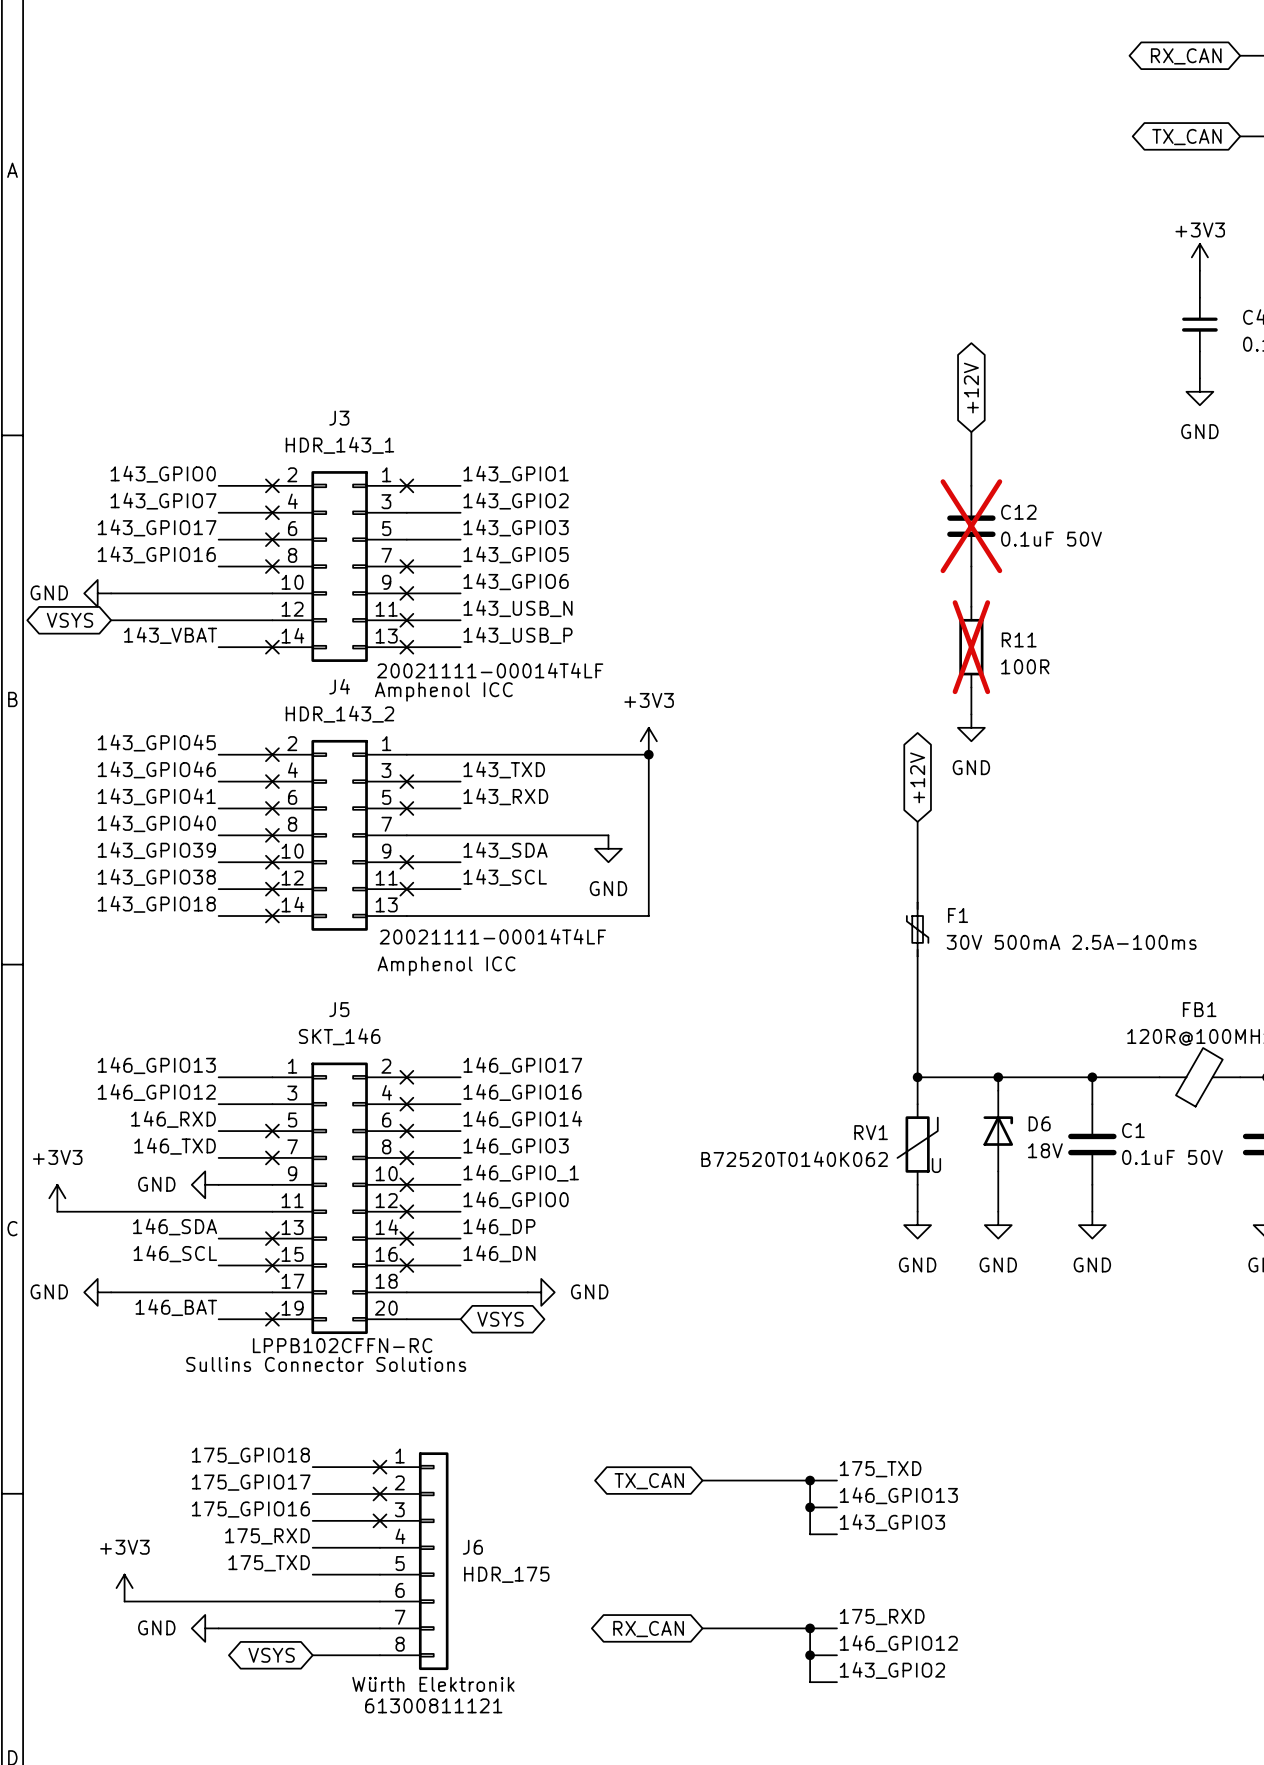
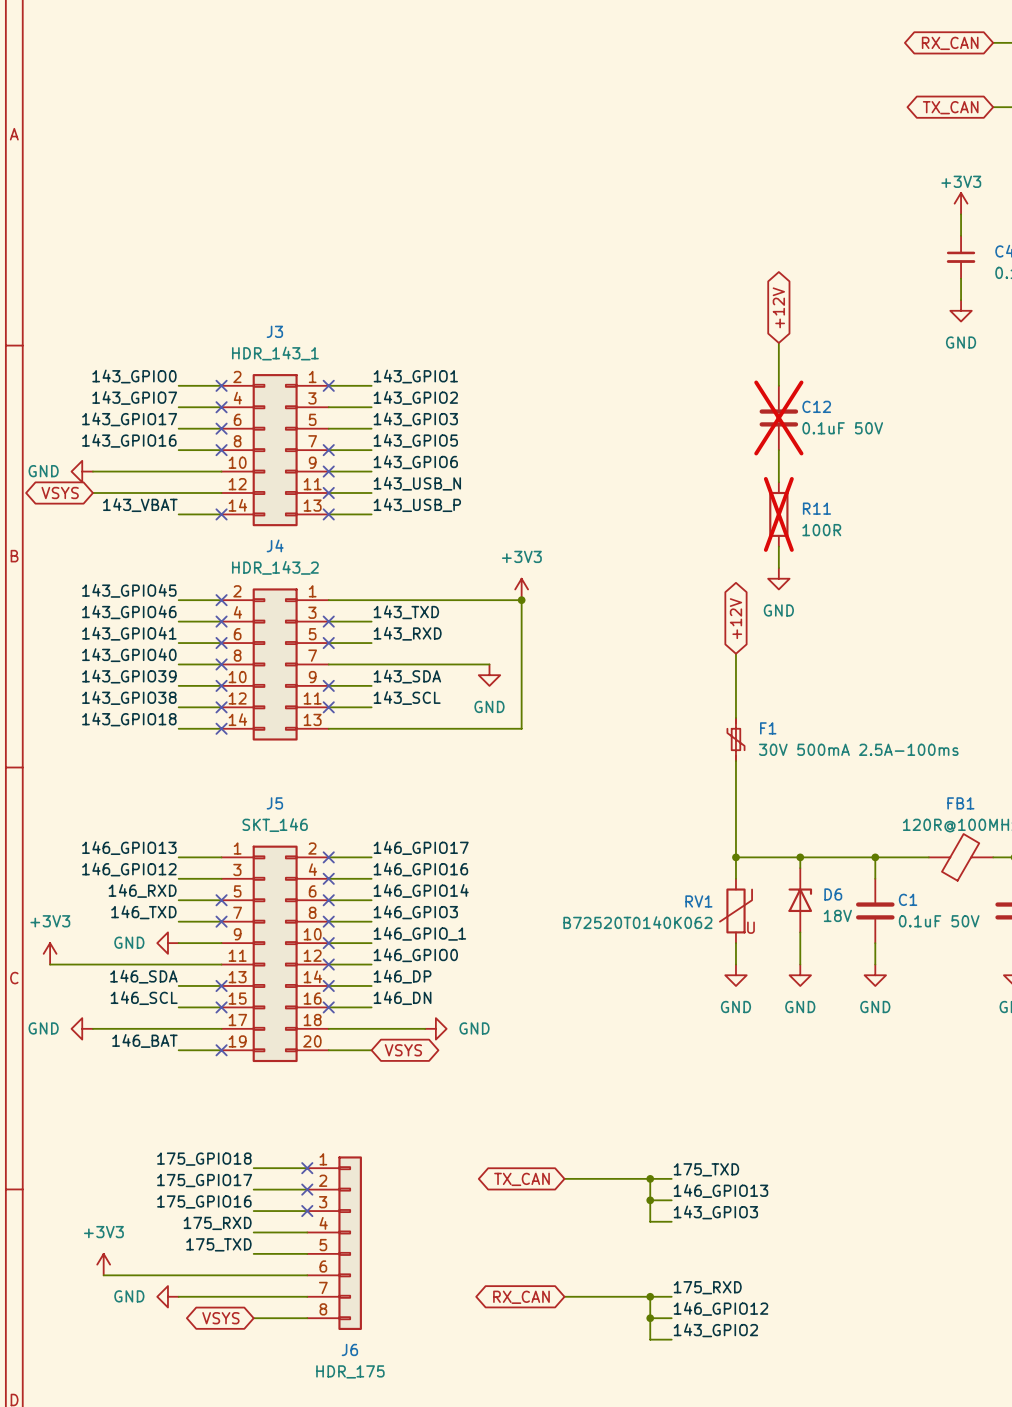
J3 text: 20021111-00014T4LF (490, 670) -> none
J3 text: Amphenol ICC (443, 691) -> none
J4 text: 20021111-00014T4LF (492, 936) -> none
J4 text: Amphenol ICC (446, 966) -> none
J5 text: LPPB102CFFN-RC (342, 1345) -> none
J5 text: Sullins Connector Solutions (326, 1364) -> none
J6 name position: J6 (472, 1547) -> J6 (349, 1349)
J6 value position: HDR_175 (506, 1574) -> HDR_175 (350, 1371)
J6 text: Würth Elektronik (433, 1684) -> none
J6 text: 61300811121 (433, 1705) -> none

